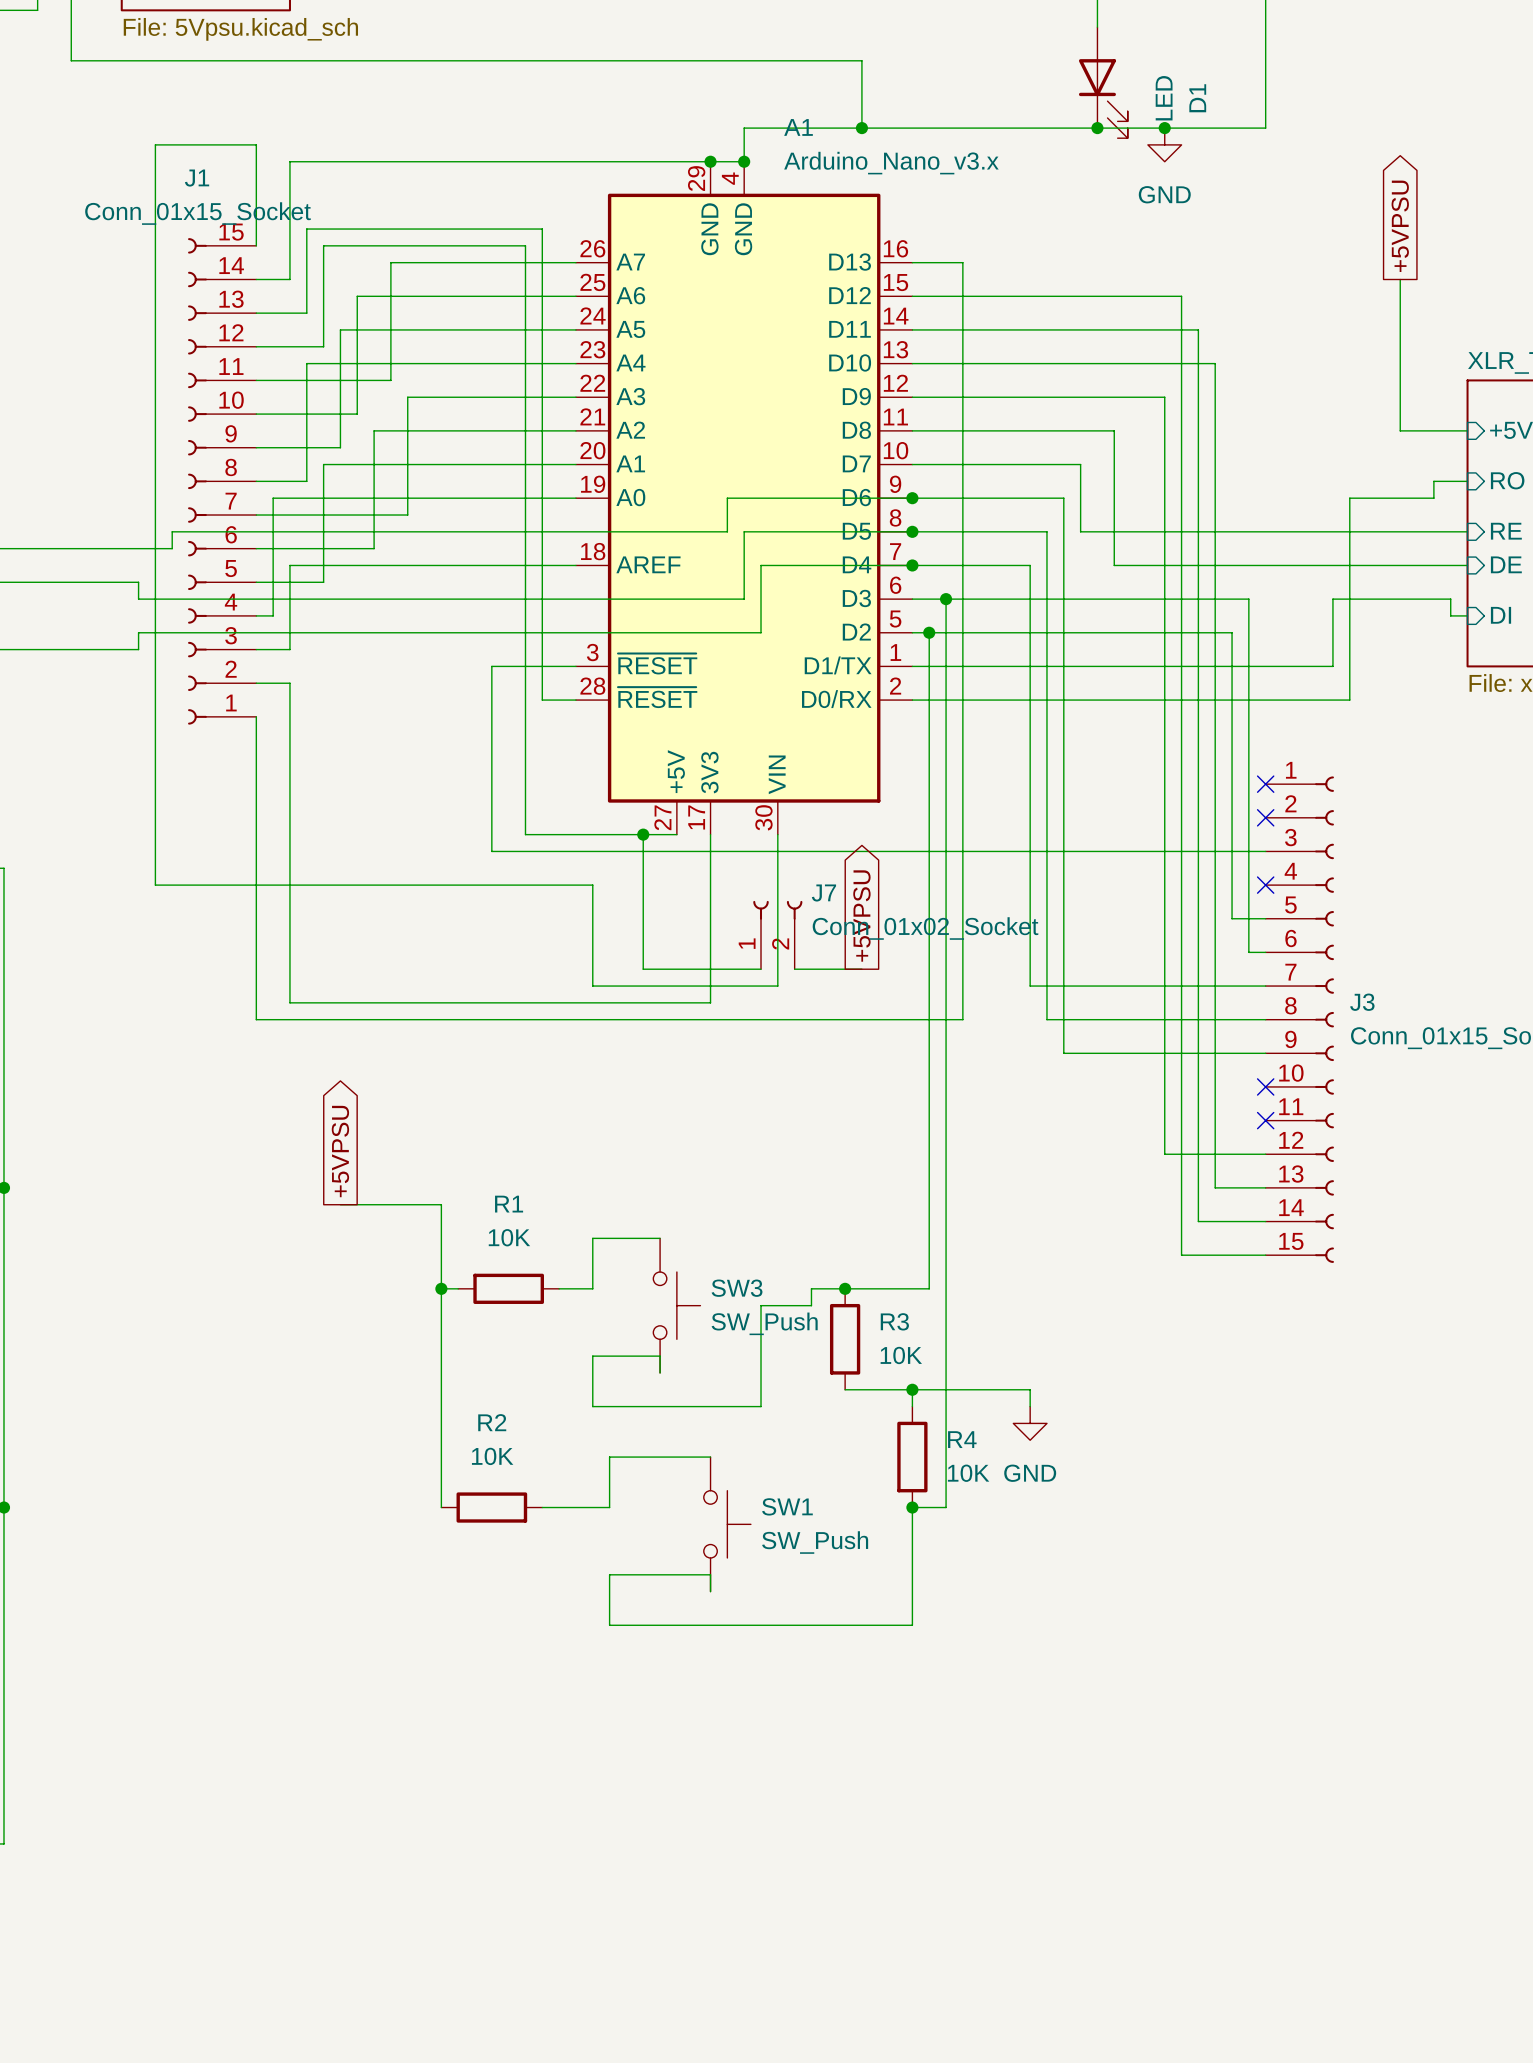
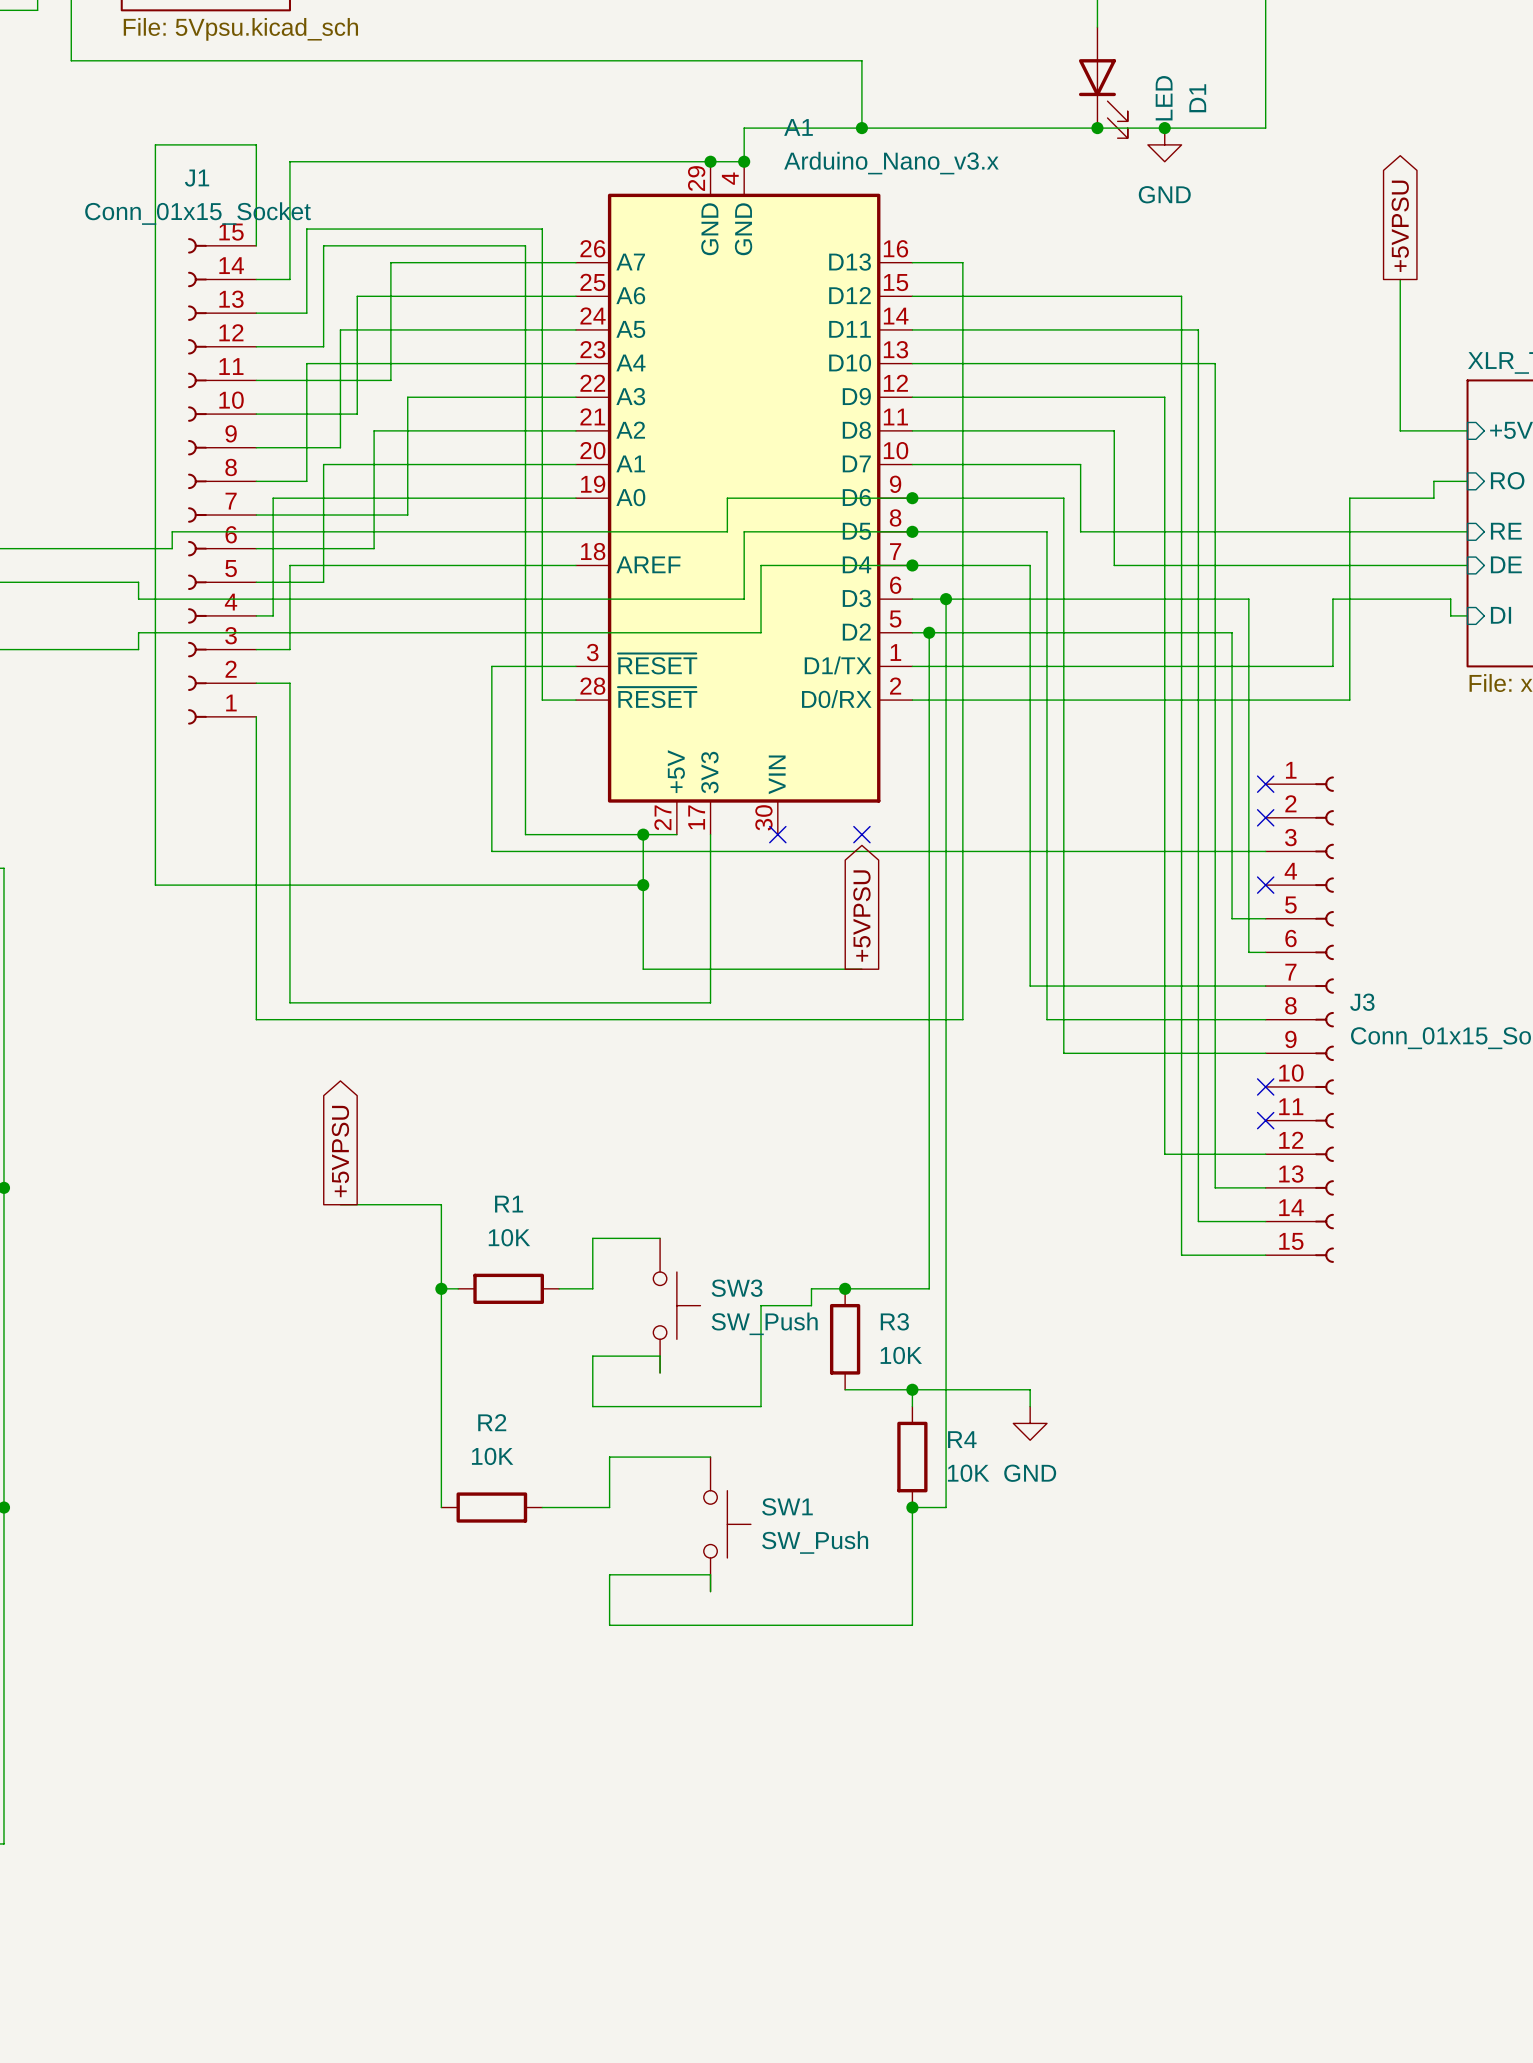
wire: (777, 834) (777, 986) (592, 986) (592, 885) -> (643, 885) (592, 885)
no-connect mark: none -> (777, 834)
no-connect mark: none -> (861, 834)
junction: none -> (643, 885)
J7: Conn_01x02_Socket (777, 935) -> none
wire: none -> (761, 969) (794, 969)

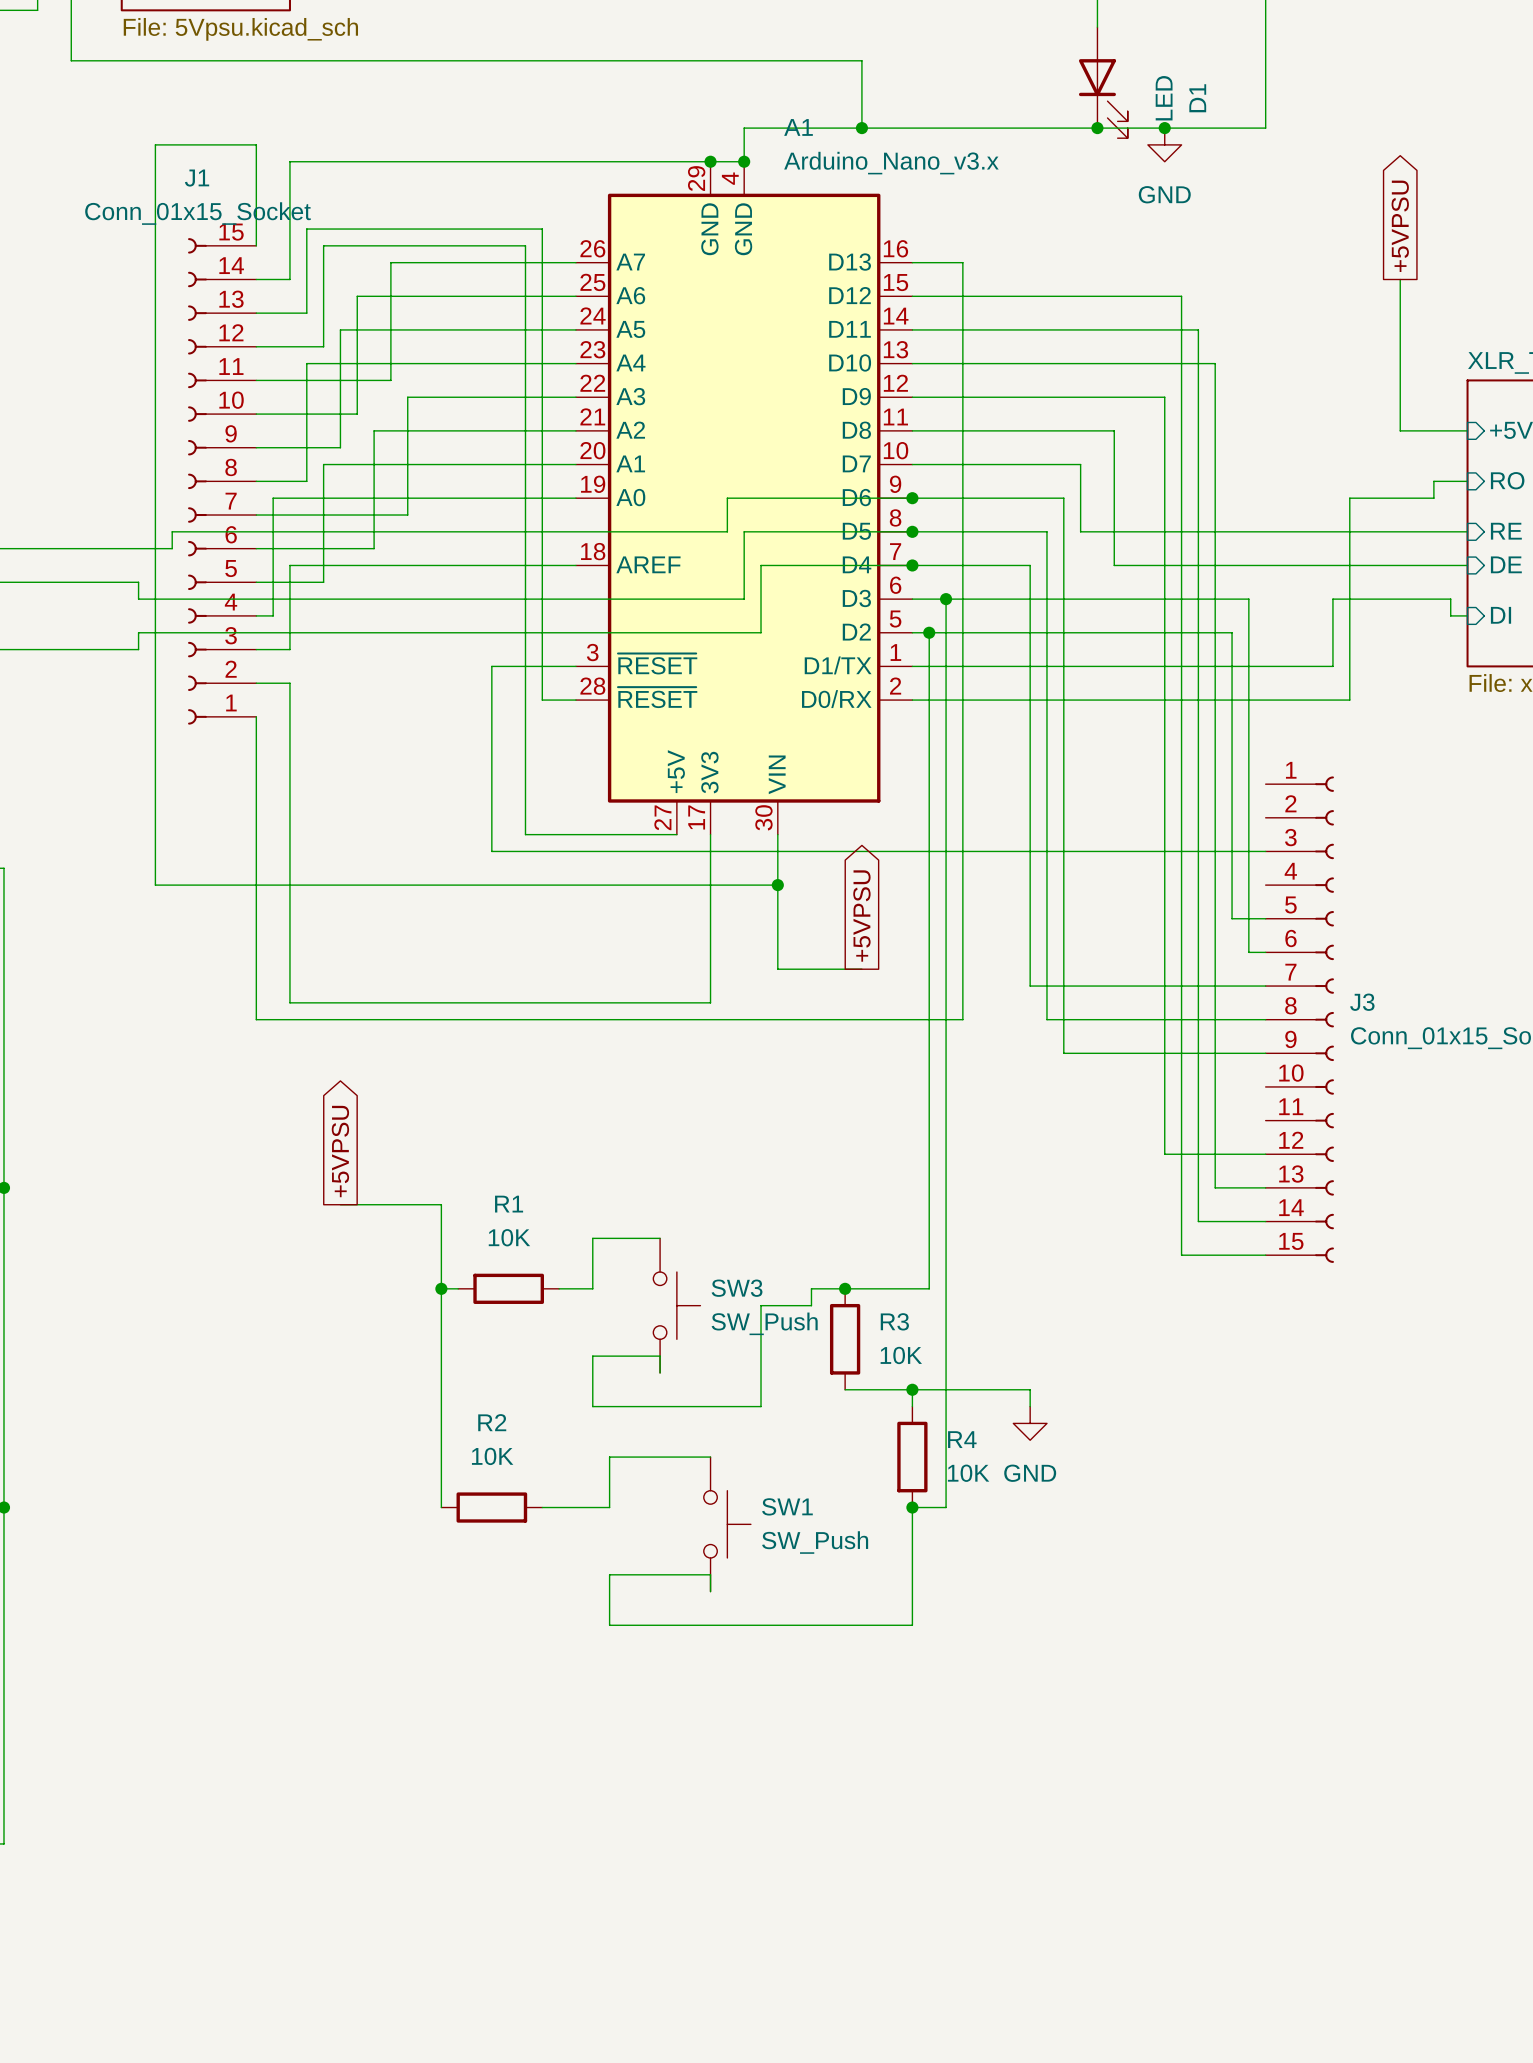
no-connect mark: (1265, 784) -> none
no-connect mark: (1265, 817) -> none
wire: (643, 834) (643, 969) (777, 969) -> (777, 834) (777, 969)
junction: (643, 834) -> none
no-connect mark: (777, 834) -> none
no-connect mark: (861, 834) -> none
wire: none -> (643, 885) (777, 885)
junction: (643, 885) -> none
junction: none -> (777, 885)
no-connect mark: (1265, 885) -> none
no-connect mark: (1265, 1086) -> none
no-connect mark: (1265, 1120) -> none

